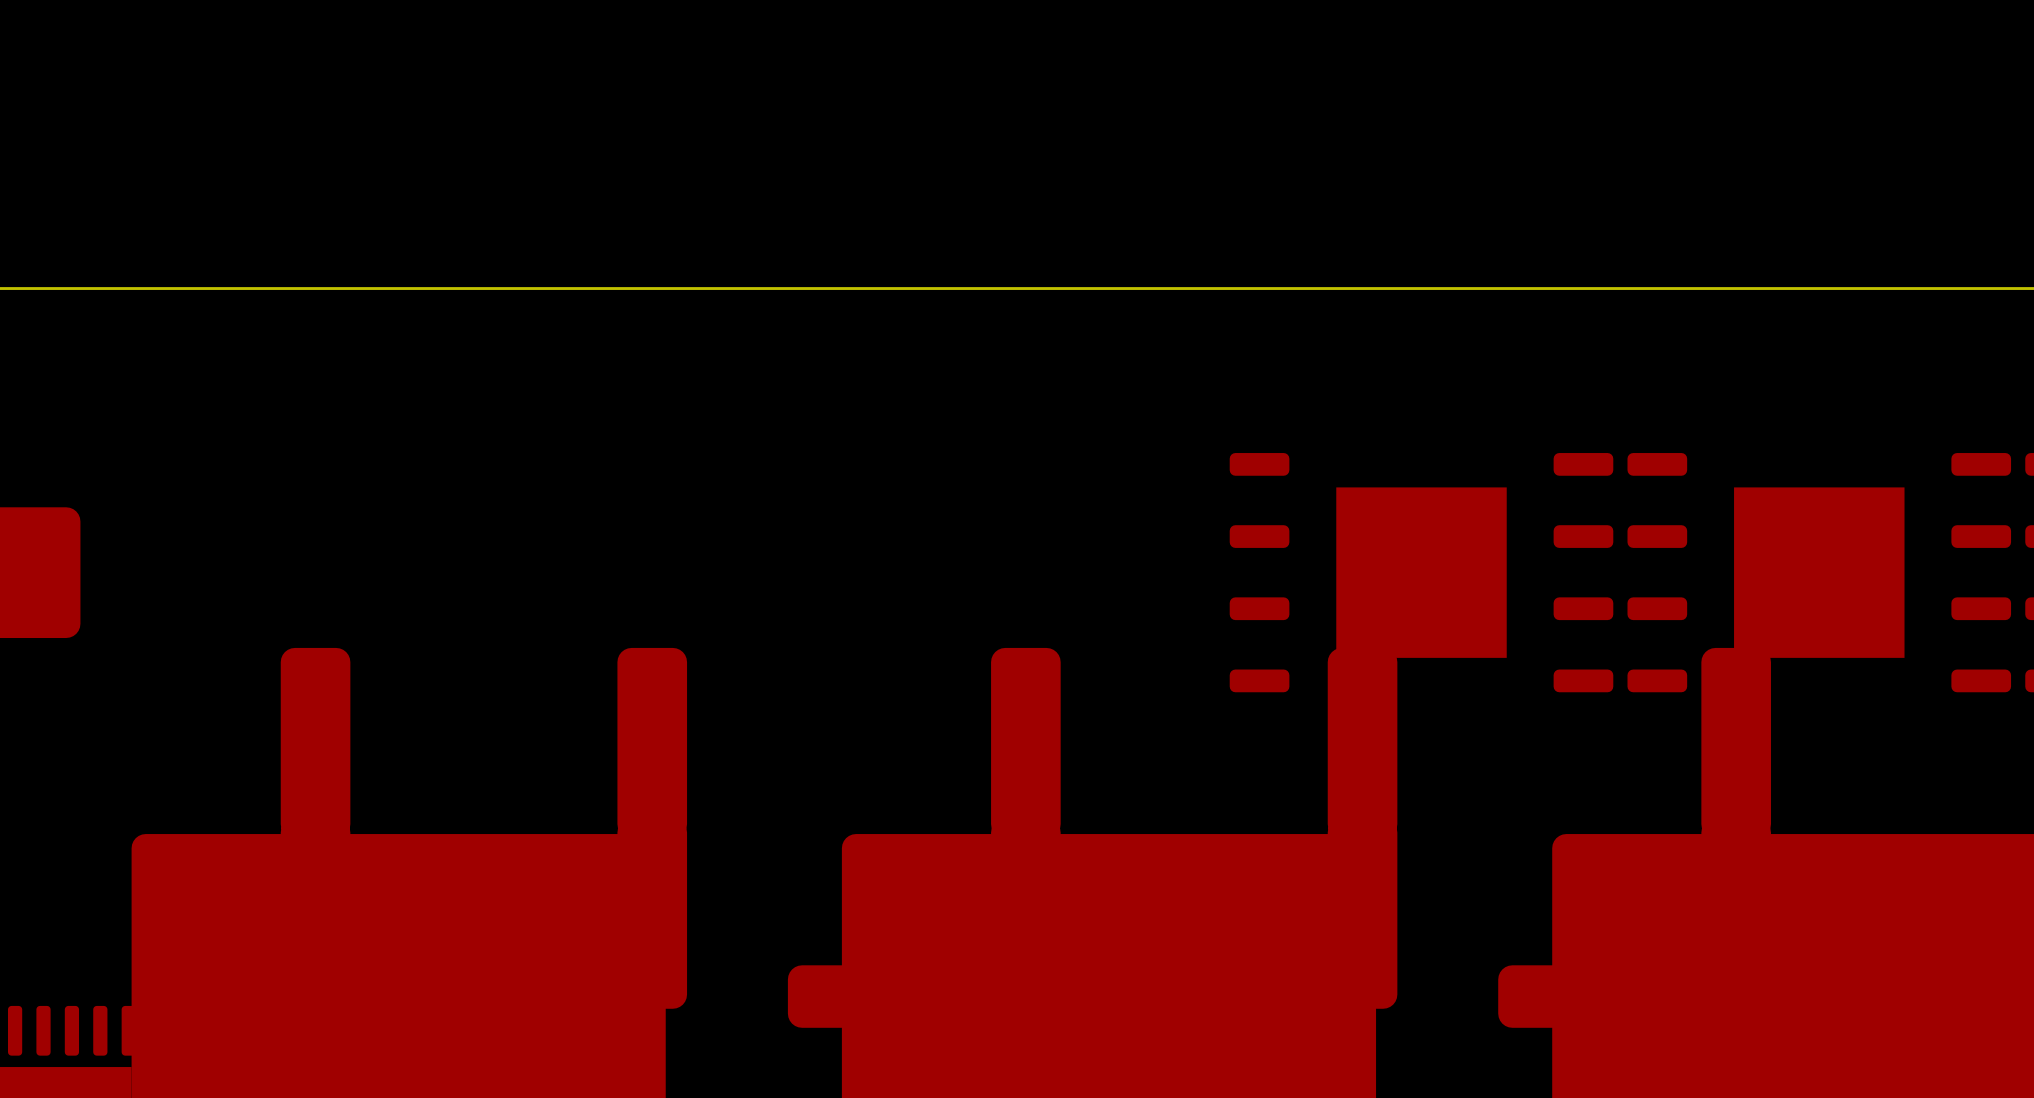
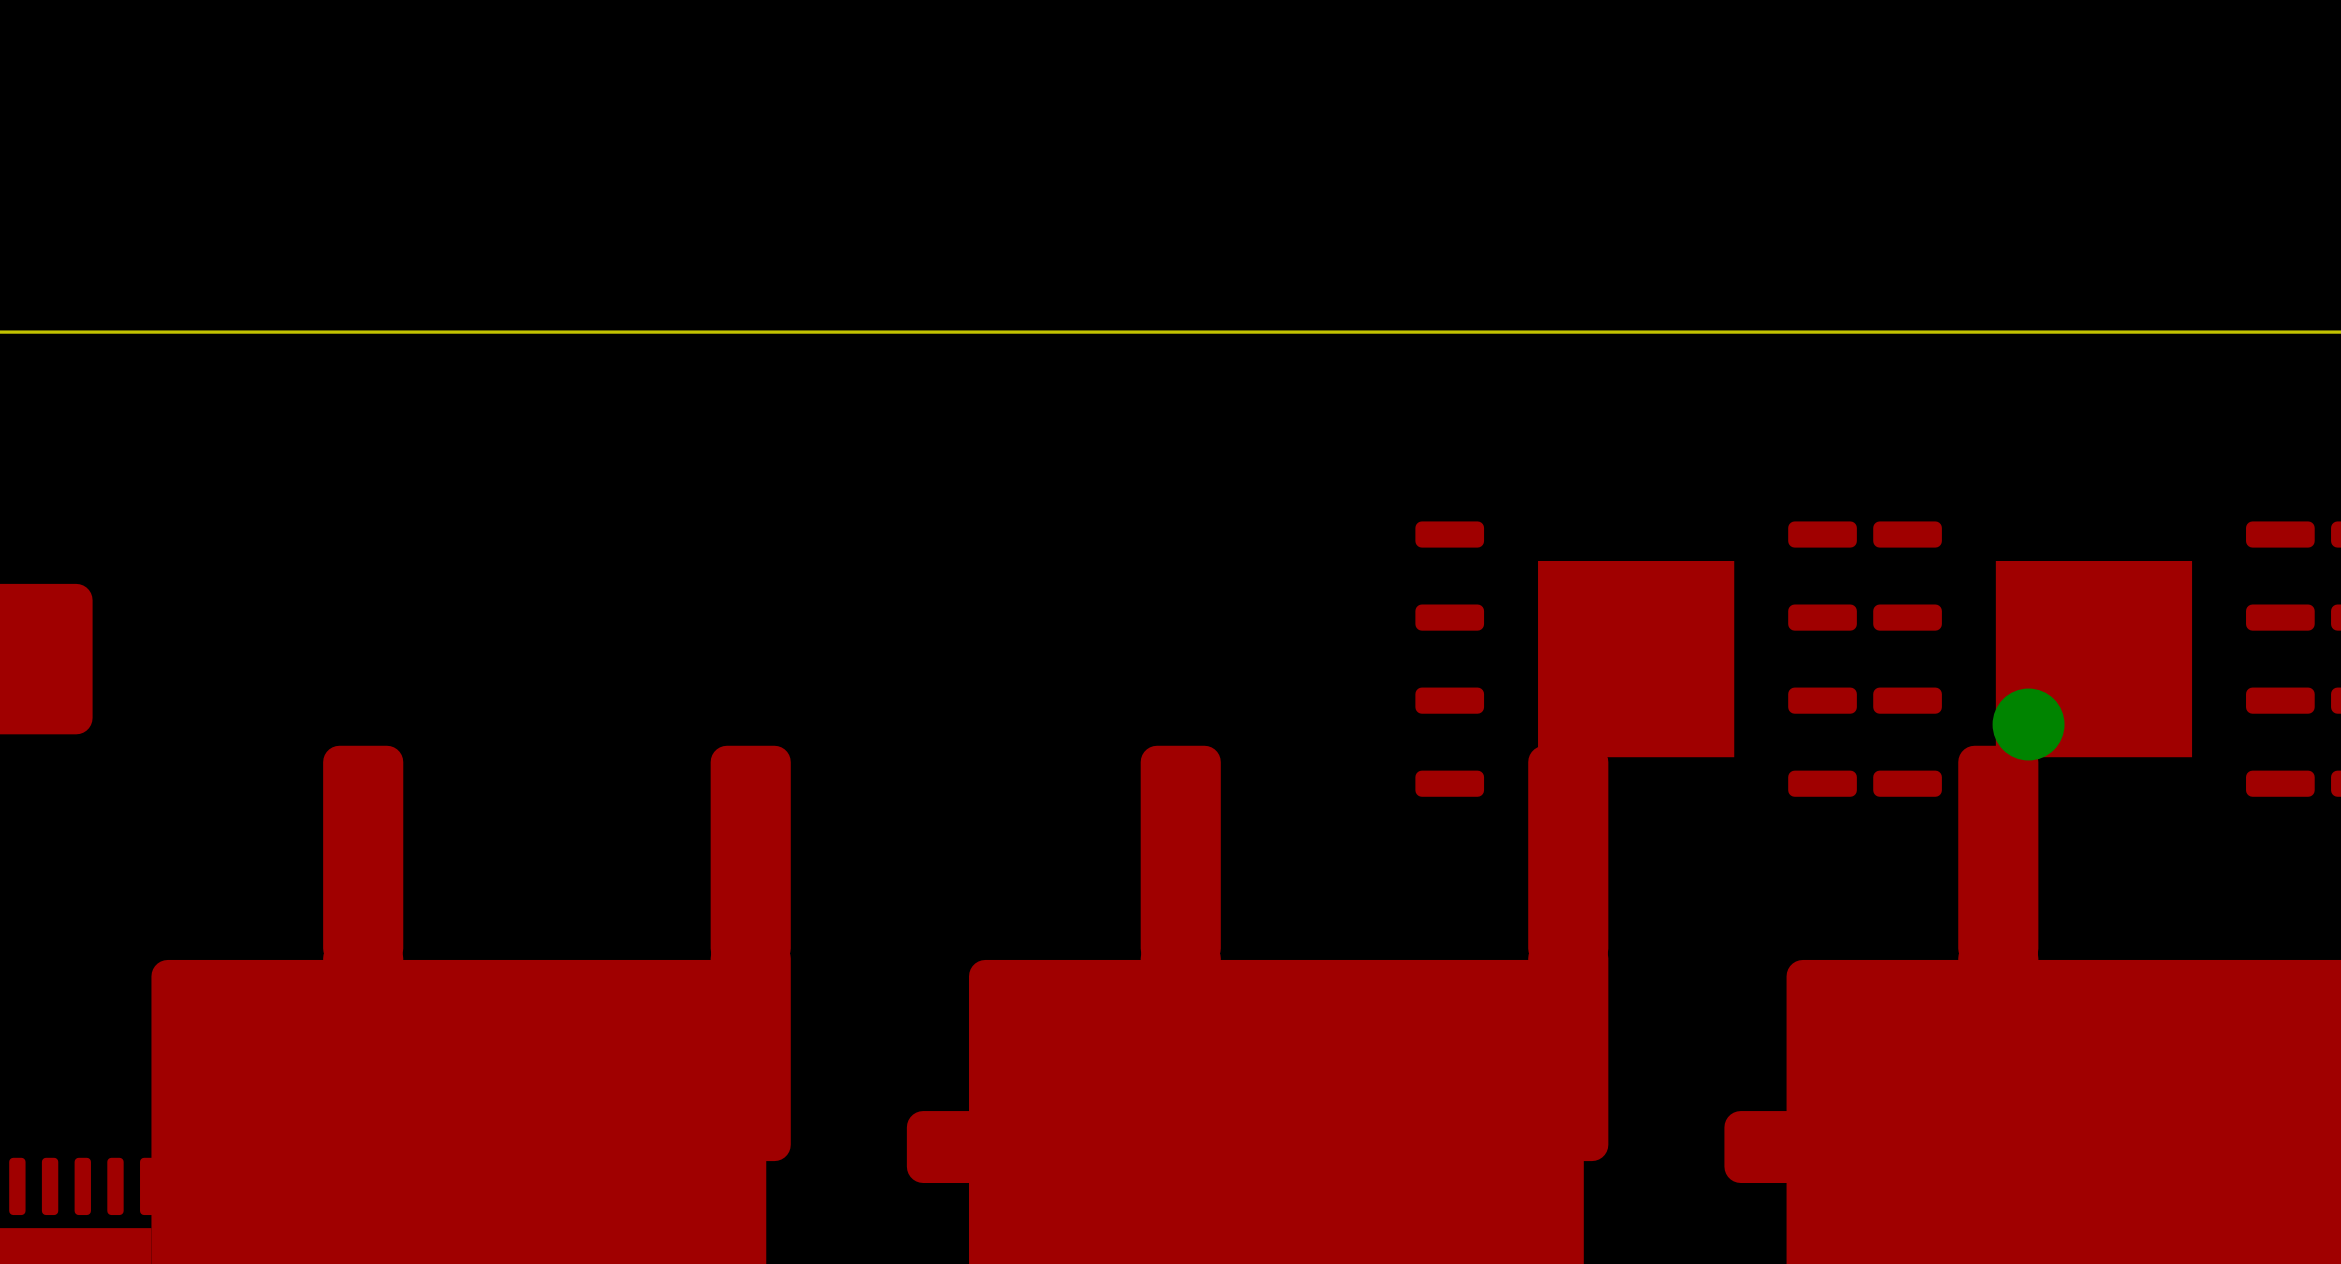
drawing: none -> [1992, 688, 2065, 761]

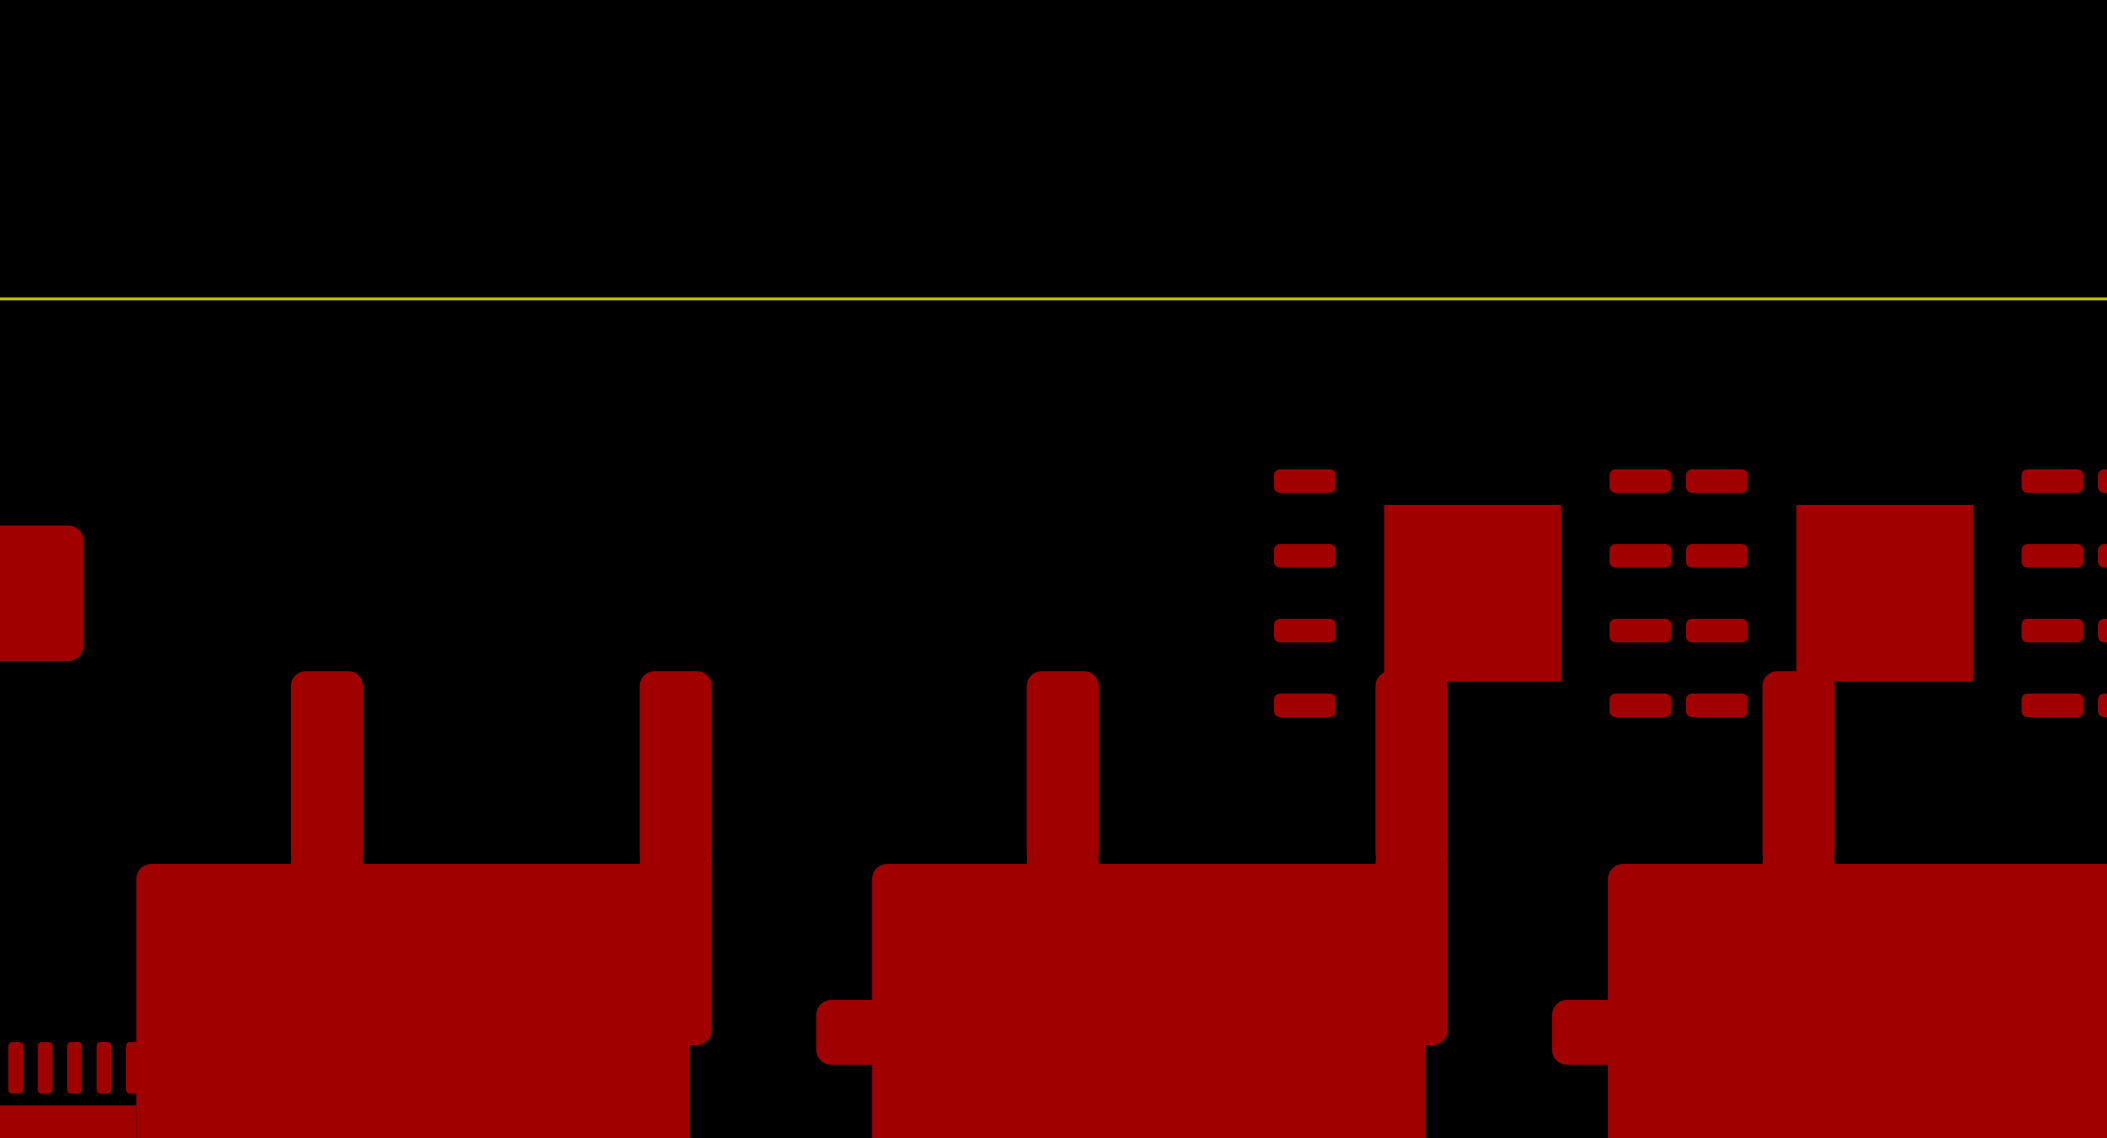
drawing: [1992, 688, 2065, 761] -> none

